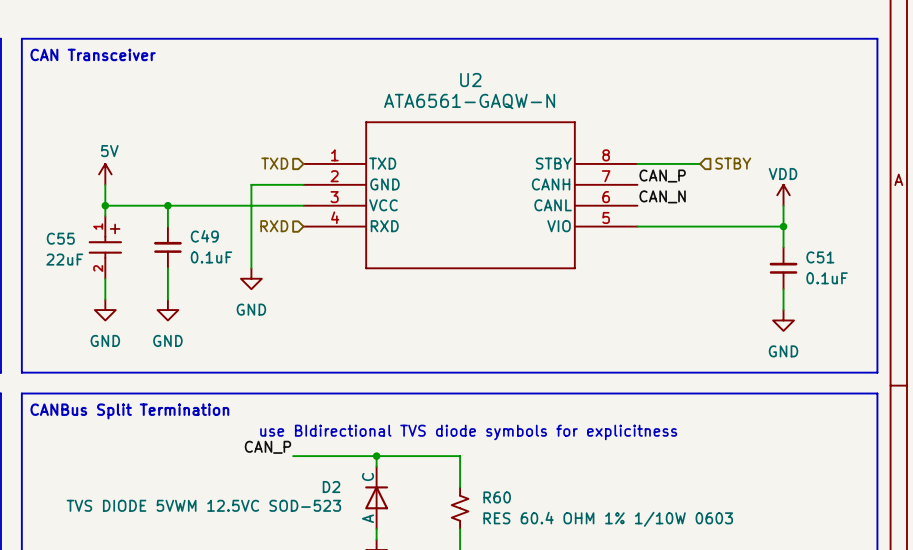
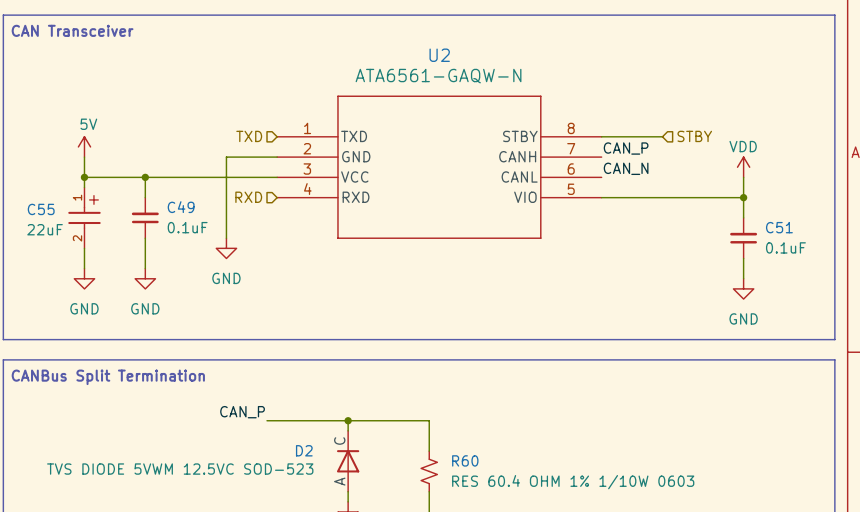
text: use BIdirectional TVS diode symbols for explicitness (468, 432) -> none

